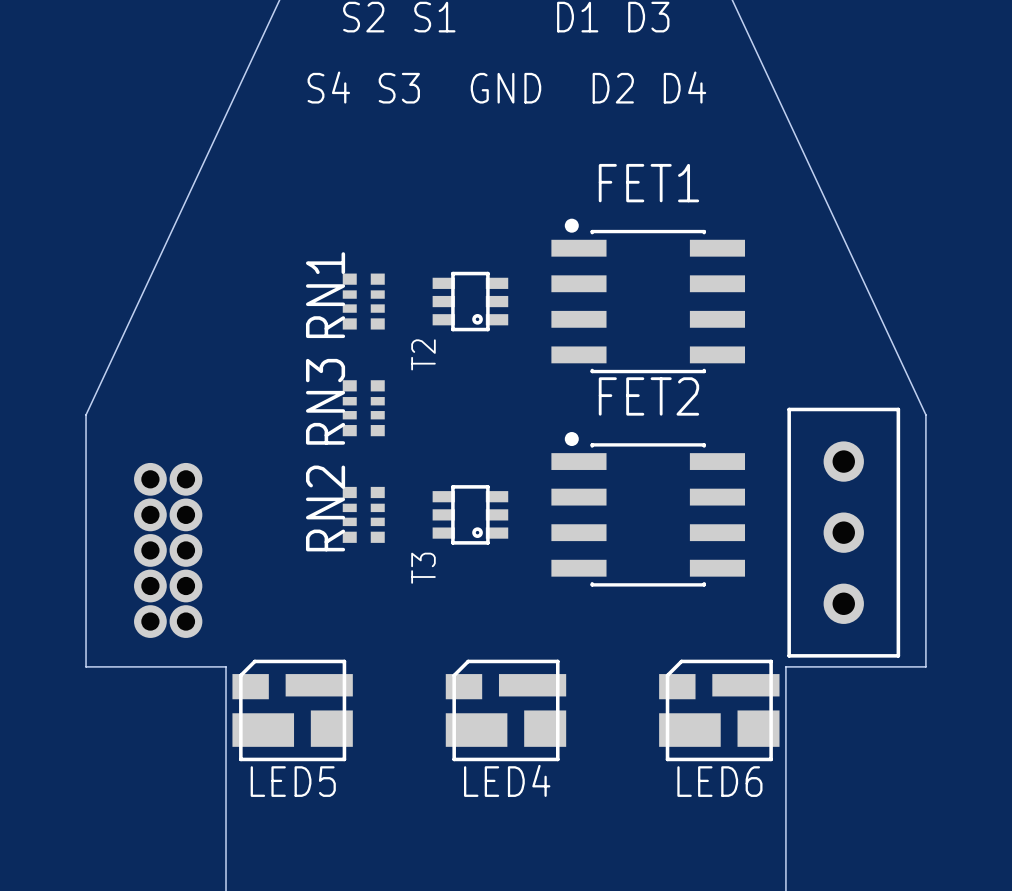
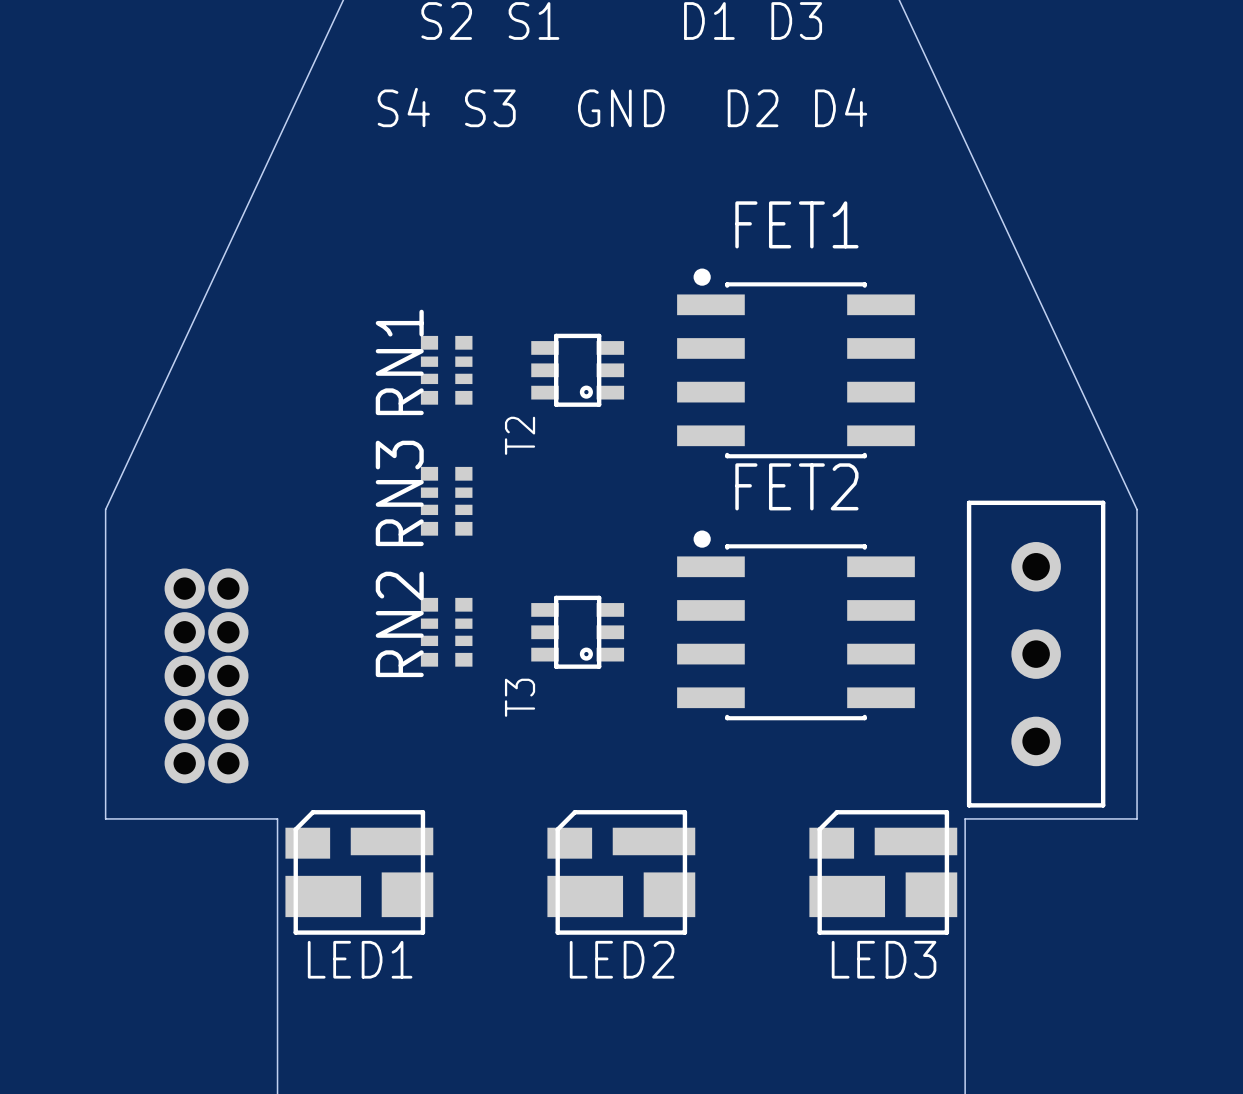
LED4 name: LED4 (507, 780) -> LED2 (622, 959)
LED5 name: LED5 (293, 781) -> LED1 (360, 959)
LED6 name: LED6 (719, 781) -> LED3 (884, 959)

